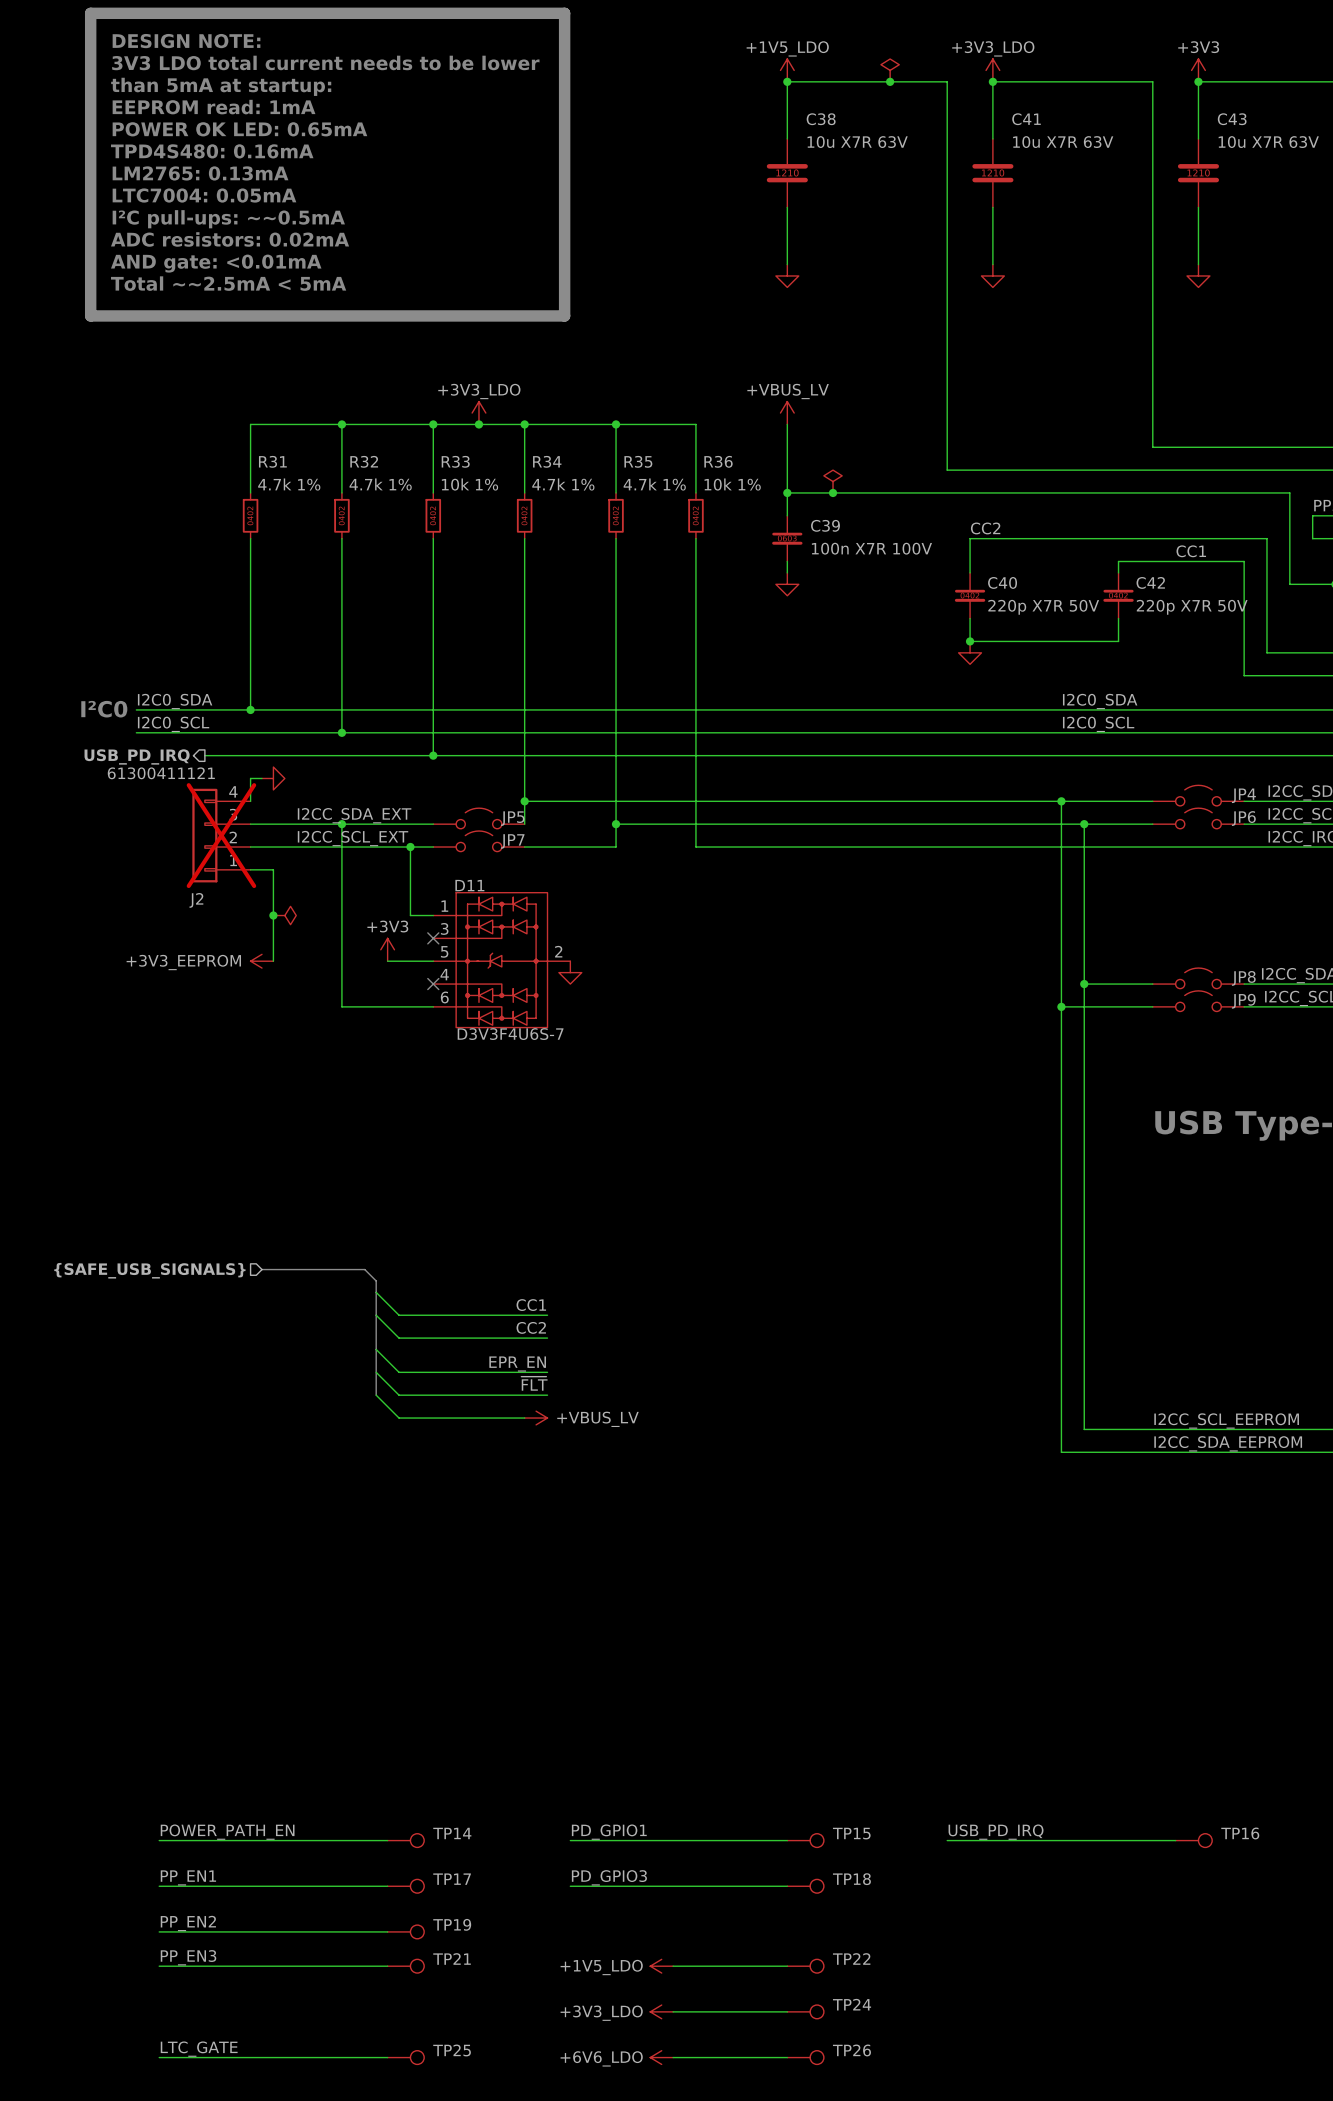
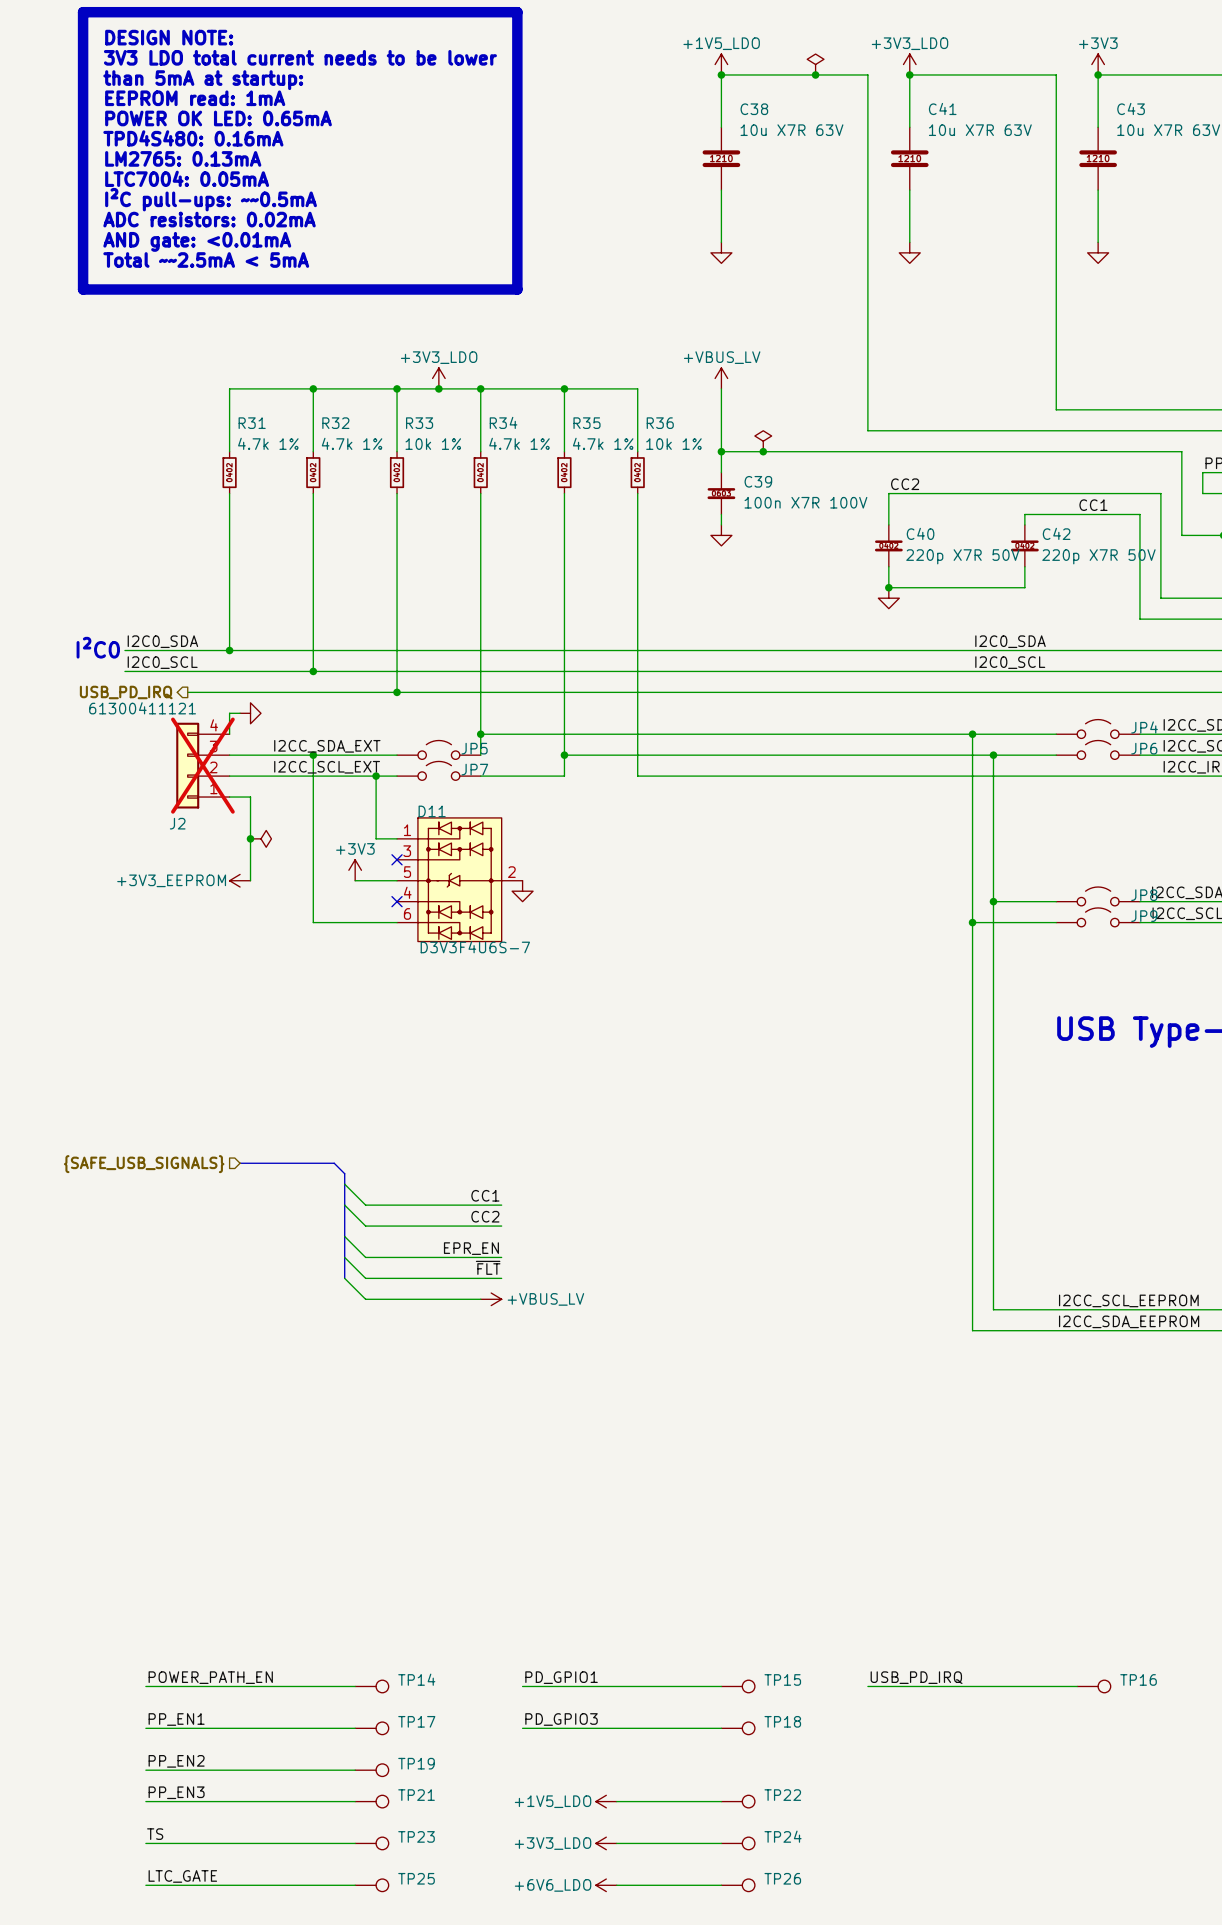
label: none -> TS (155, 1834)
wire: none -> (145, 1843) (355, 1843)
TP23: none -> (371, 1843)

